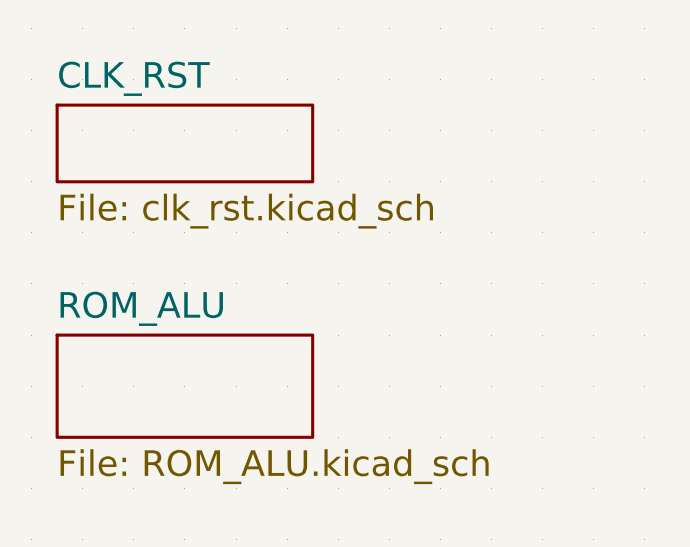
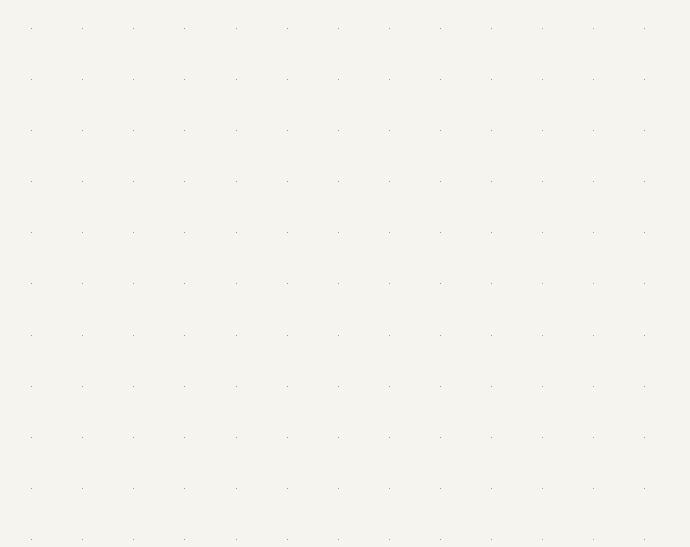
sheet CLK_RST: File: clk_rst.kicad_sch (184, 143) -> none
sheet ROM_ALU: File: ROM_ALU.kicad_sch (184, 386) -> none

